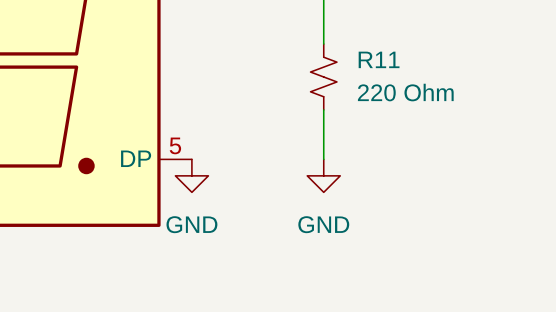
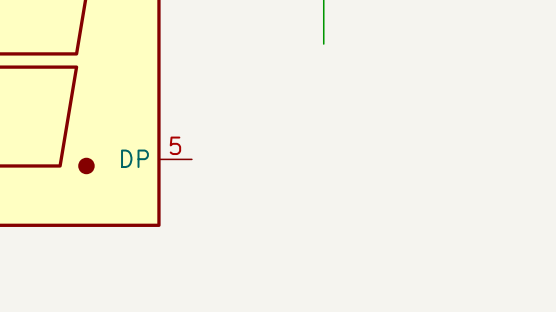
R11: 220 Ohm (323, 76) -> none
wire: (323, 109) (323, 159) -> none
power symbol: GND (191, 175) -> none
power symbol: GND (323, 175) -> none

